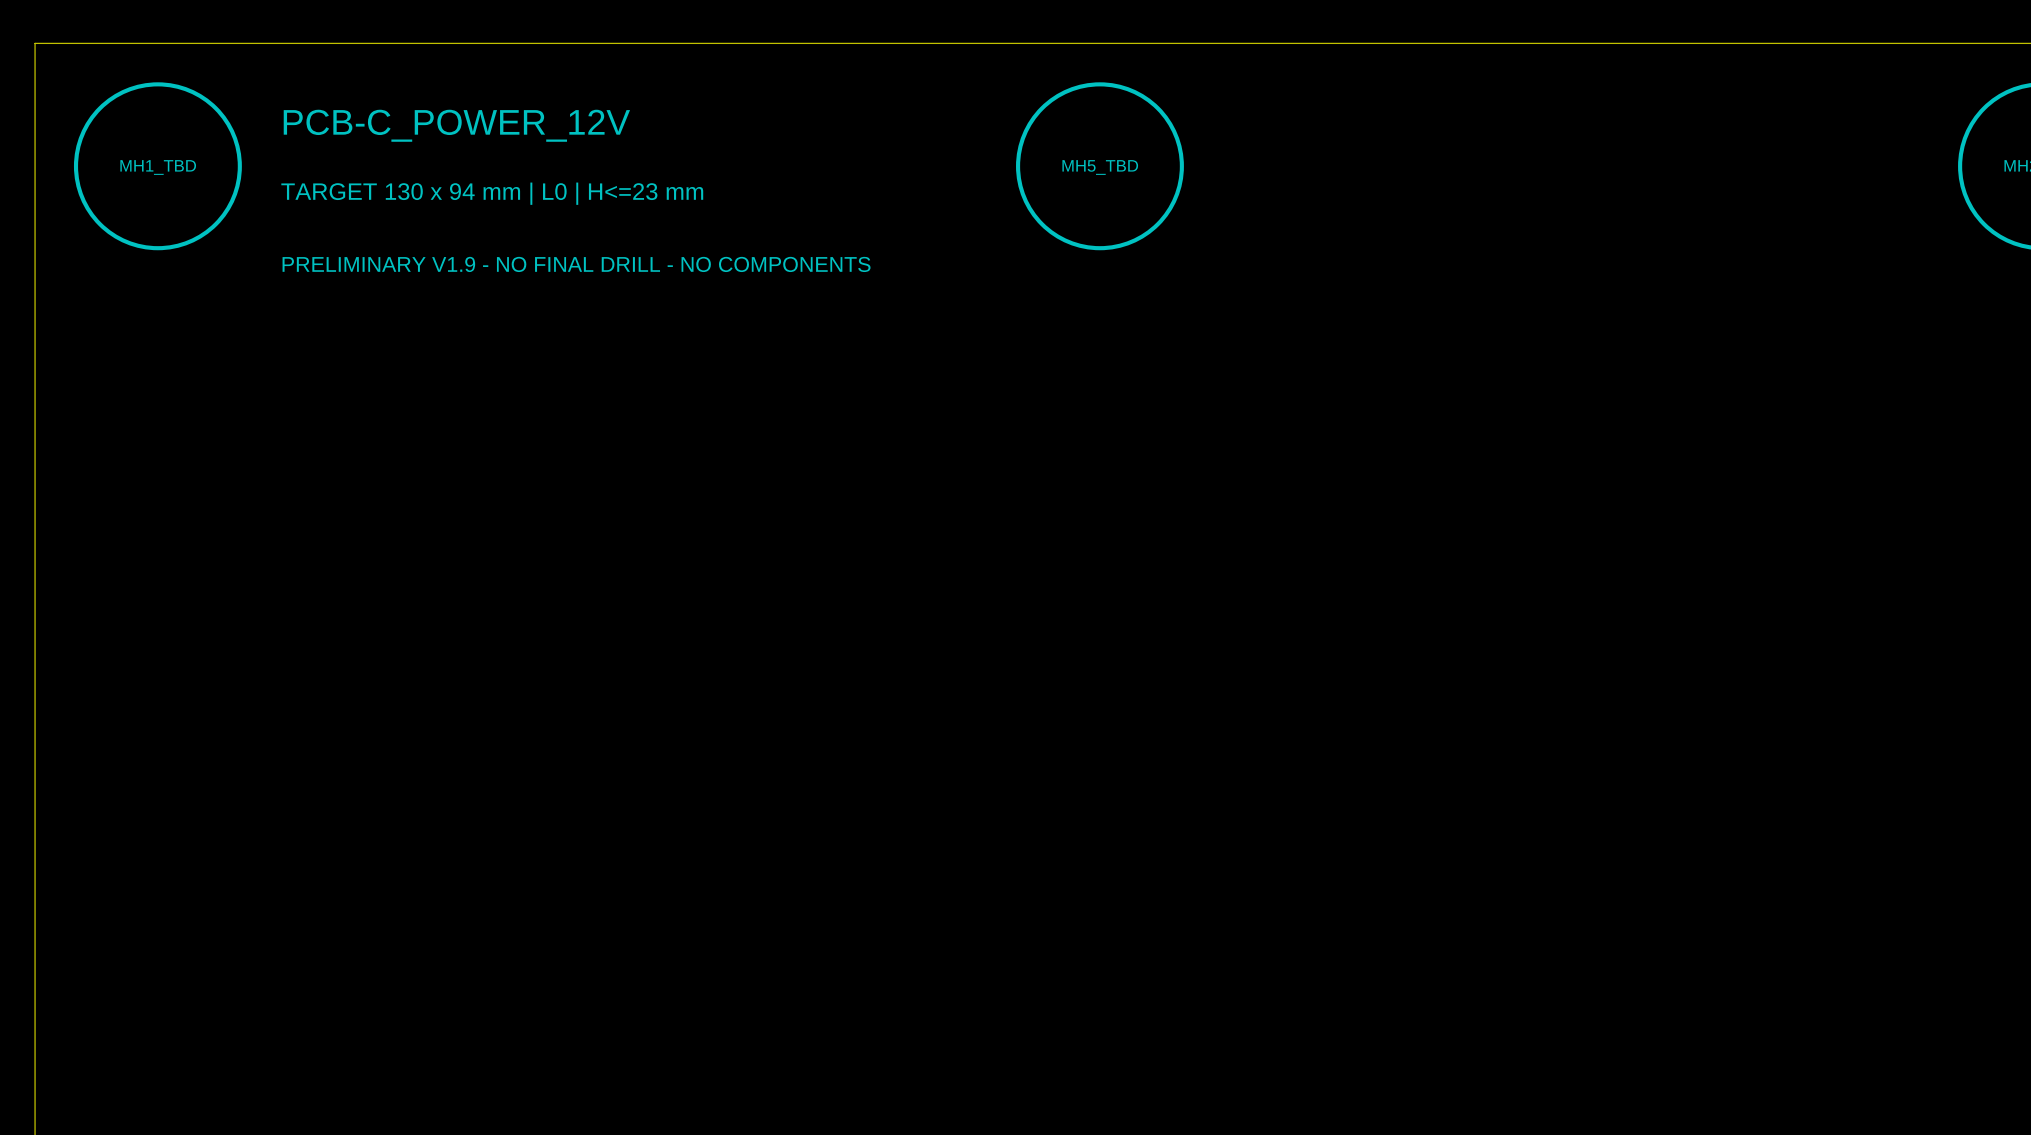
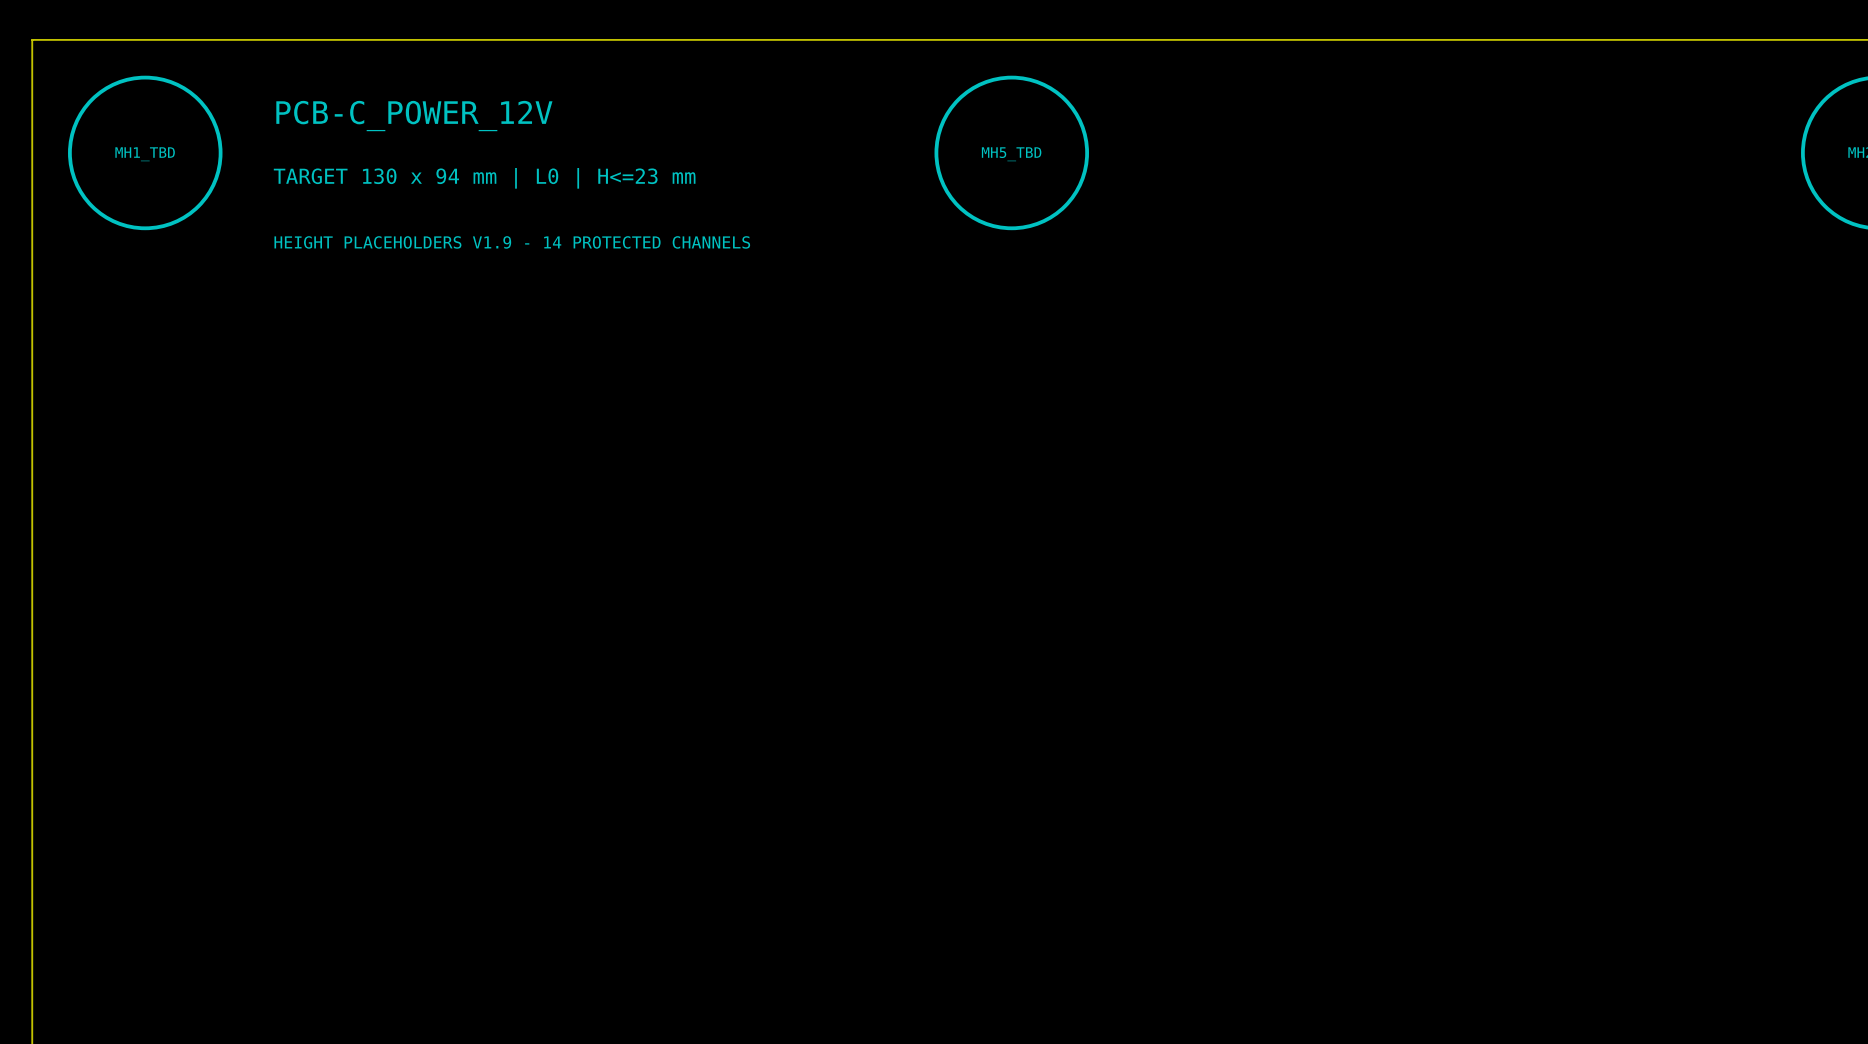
text position: PCB-C_POWER_12V (456, 125) -> PCB-C_POWER_12V (414, 116)
text position: TARGET 130 x 94 mm | L0 | H<=23 mm (492, 193) -> TARGET 130 x 94 mm | L0 | H<=23 mm (484, 178)
text: PRELIMINARY V1.9 - NO FINAL DRILL - NO COMPONENTS (576, 264) -> HEIGHT PLACEHOLDERS V1.9 - 14 PROTECTED CHANNELS (512, 242)

